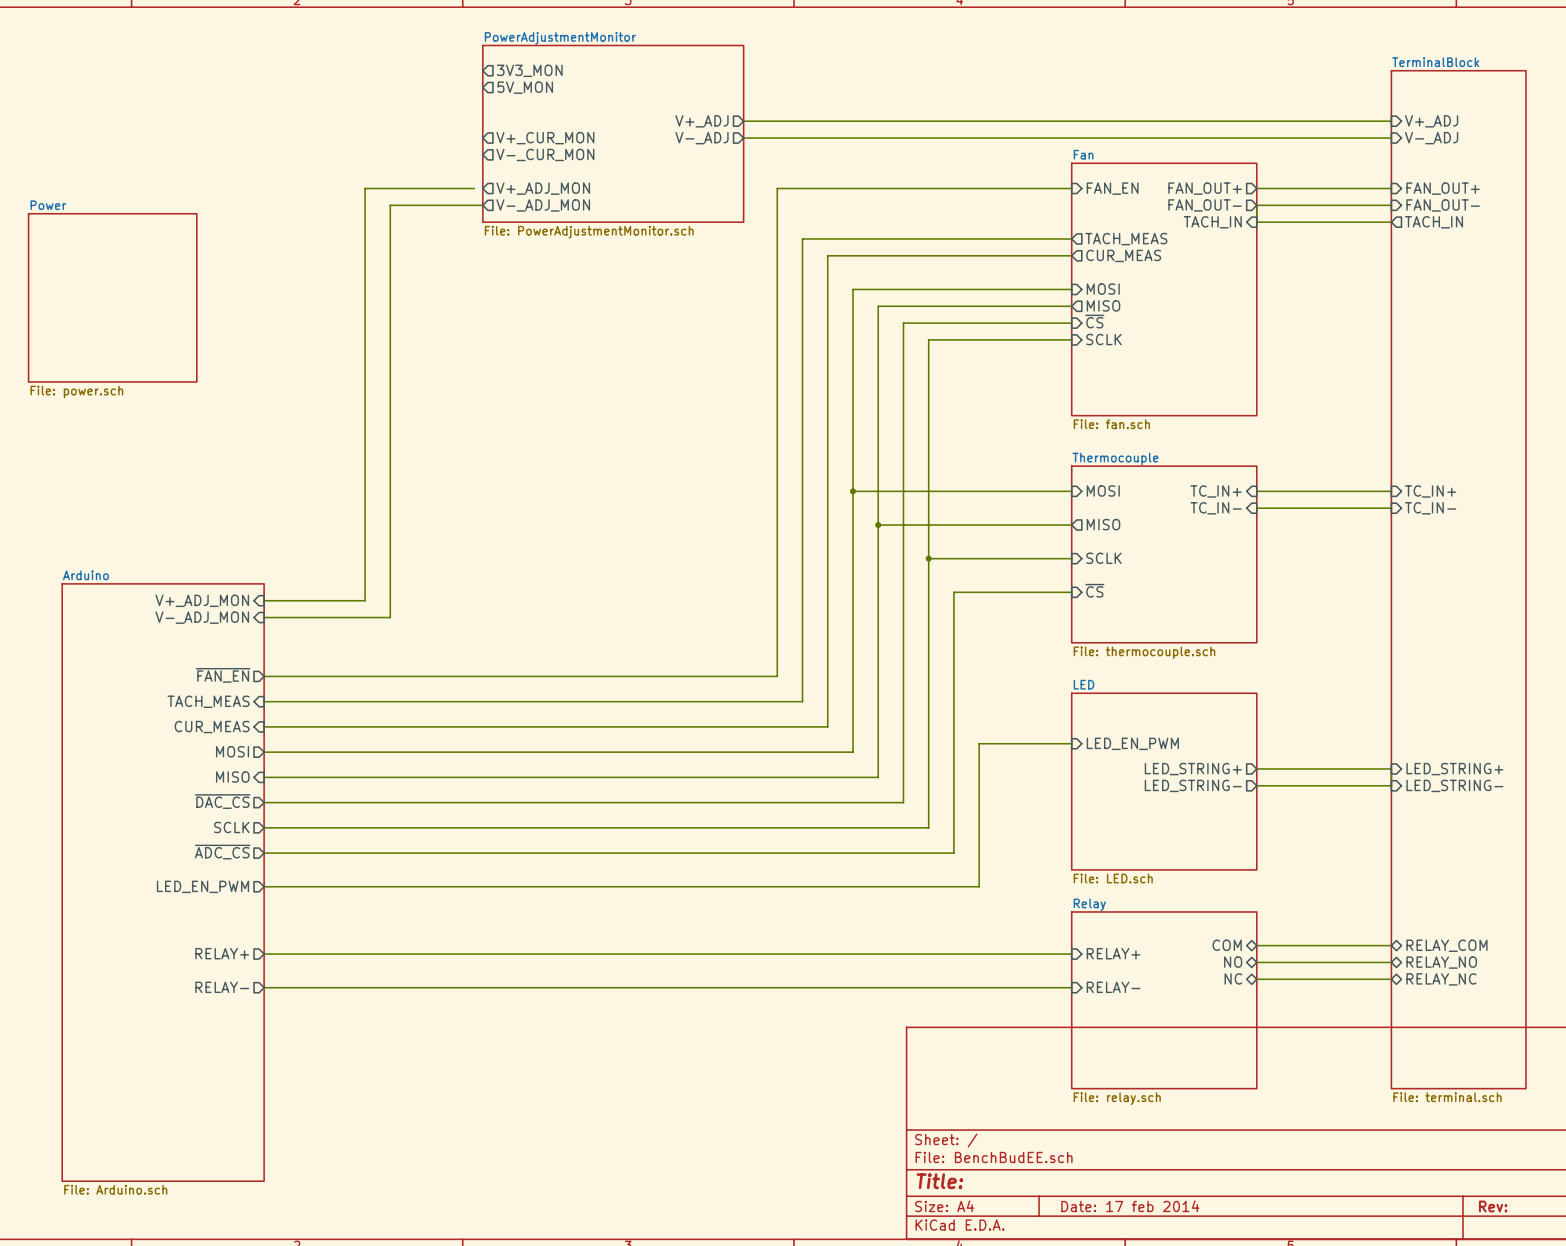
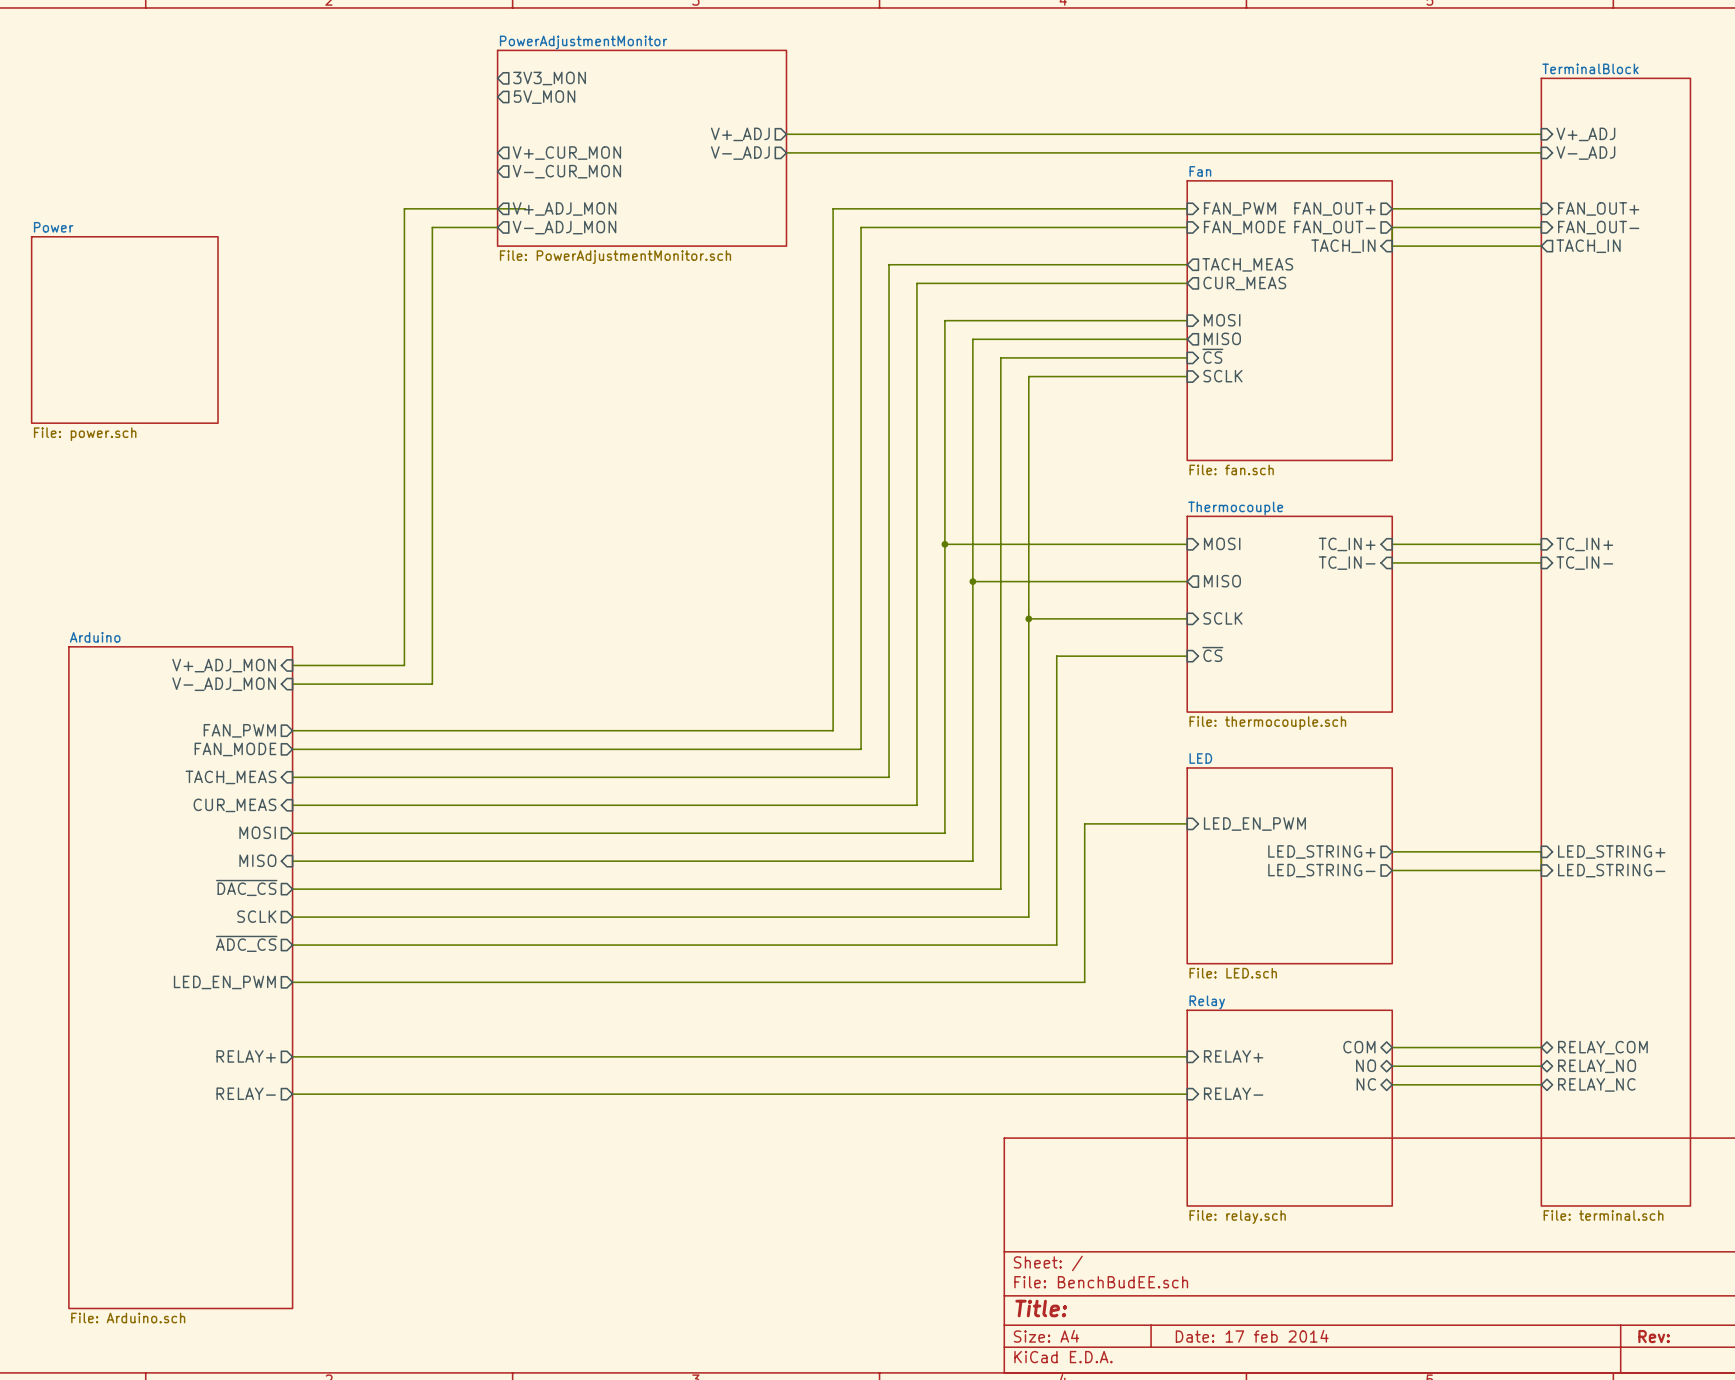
sheet pin position: 3V3_MON (529, 70) -> 3V3_MON (549, 78)
sheet pin position: 5V_MON (525, 87) -> 5V_MON (544, 97)
sheet pin position: V+_ADJ (701, 121) -> V+_ADJ (740, 134)
wire: none -> (786, 134) (823, 134)
sheet PowerAdjustmentMonitor position: (613, 133) -> (642, 148)
sheet pin position: V+_CUR_MON (545, 138) -> V+_CUR_MON (566, 153)
sheet pin position: V-_ADJ (701, 138) -> V-_ADJ (740, 153)
wire: none -> (786, 152) (823, 152)
sheet pin position: V-_CUR_MON (545, 154) -> V-_CUR_MON (566, 171)
sheet pin position: V+_ADJ_MON (543, 188) -> V+_ADJ_MON (564, 208)
wire: (777, 188) (777, 205) -> (1187, 227) (861, 227)
wire: none -> (861, 208) (833, 208) (833, 730) (292, 730)
sheet pin: FAN_EN (1112, 188) -> FAN_PWM (1240, 208)
wire: (449, 205) (482, 205) -> none
sheet pin position: V-_ADJ_MON (543, 205) -> V-_ADJ_MON (564, 227)
sheet pin: none -> FAN_MODE (1244, 227)
sheet pin: none -> FAN_PWM (239, 730)
sheet pin: ~{FAN_EN} (223, 675) -> FAN_MODE (235, 749)

